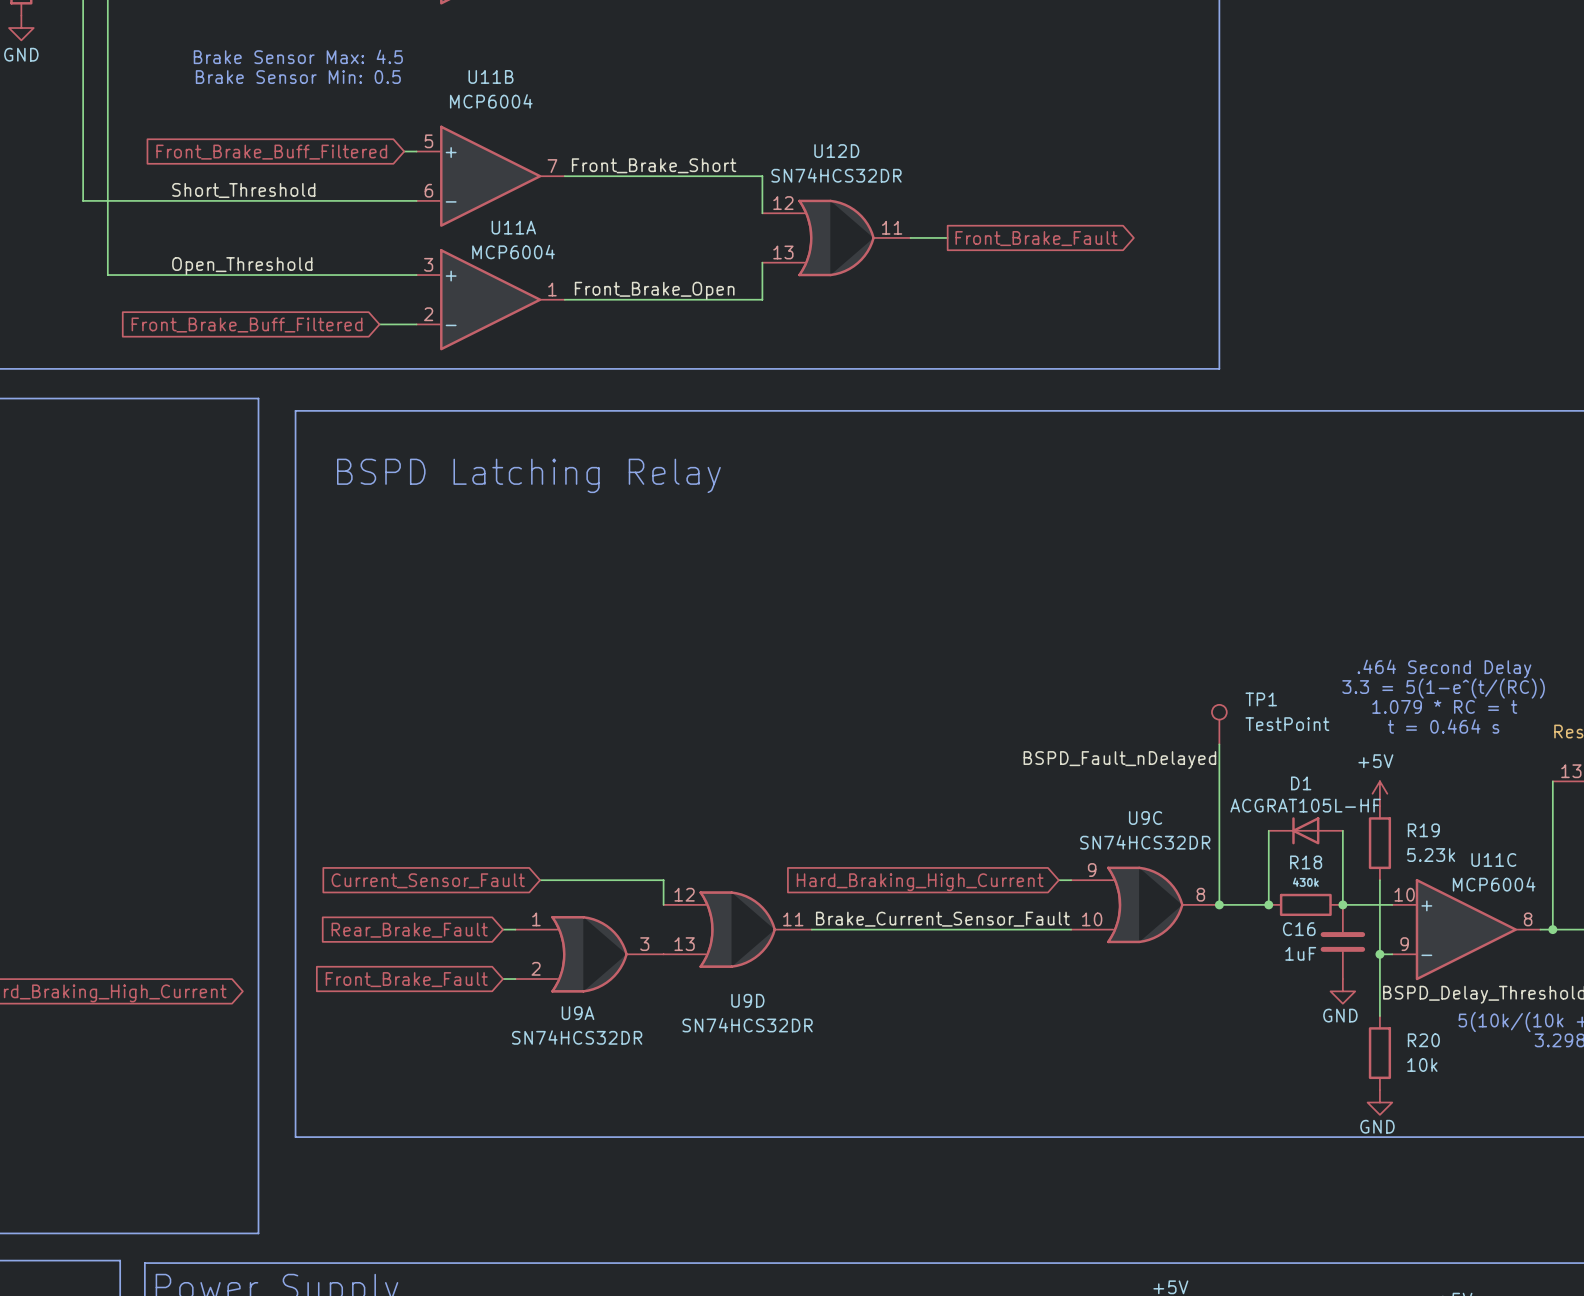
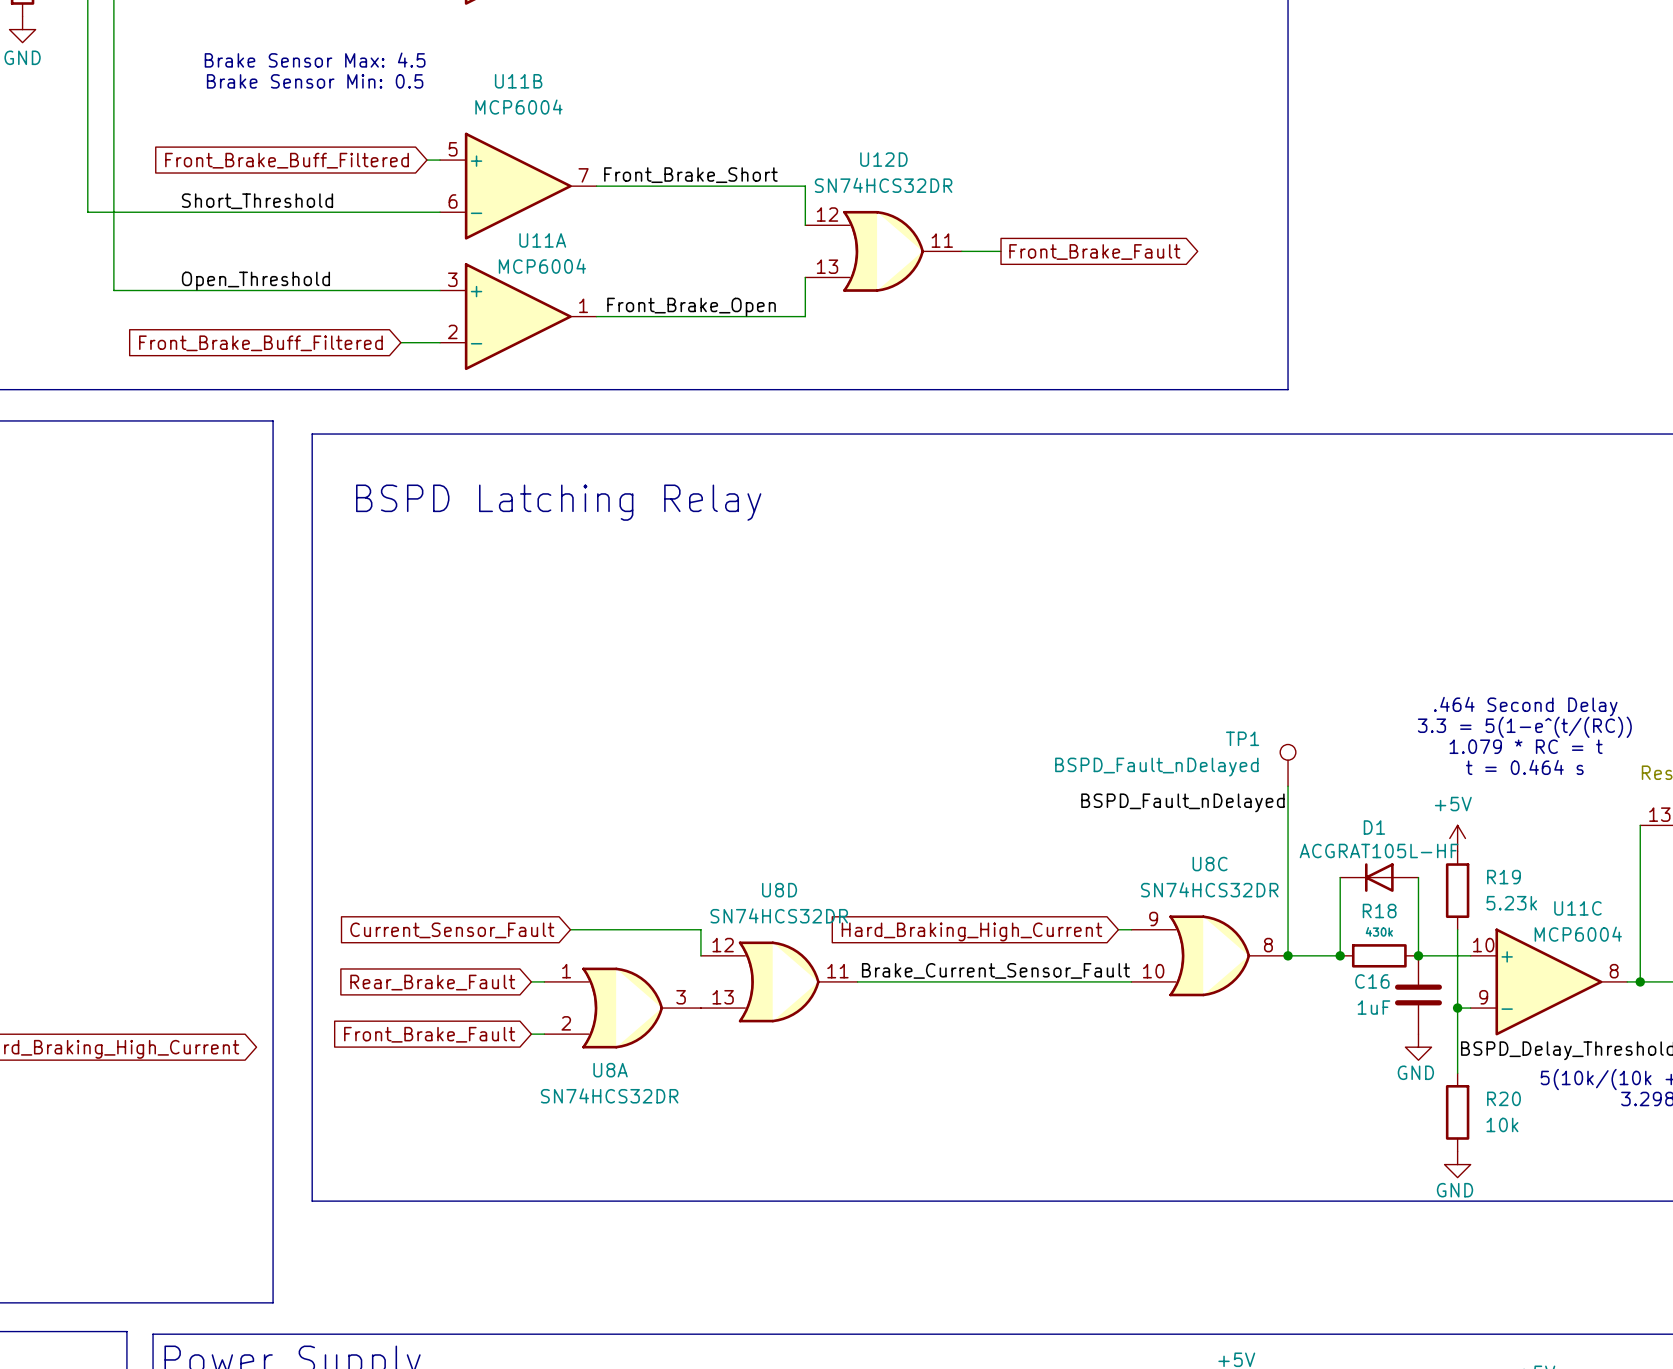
TP1 name position: TP1 (1261, 699) -> TP1 (1242, 738)
TP1 value: TestPoint (1287, 724) -> BSPD_Fault_nDelayed (1156, 767)
U9C name: U9C (1145, 817) -> U8C (1210, 864)
U9D name: U9D (747, 1000) -> U8D (779, 890)
U9A name: U9A (578, 1013) -> U8A (610, 1070)
U9D value position: SN74HCS32DR (747, 1025) -> SN74HCS32DR (779, 915)

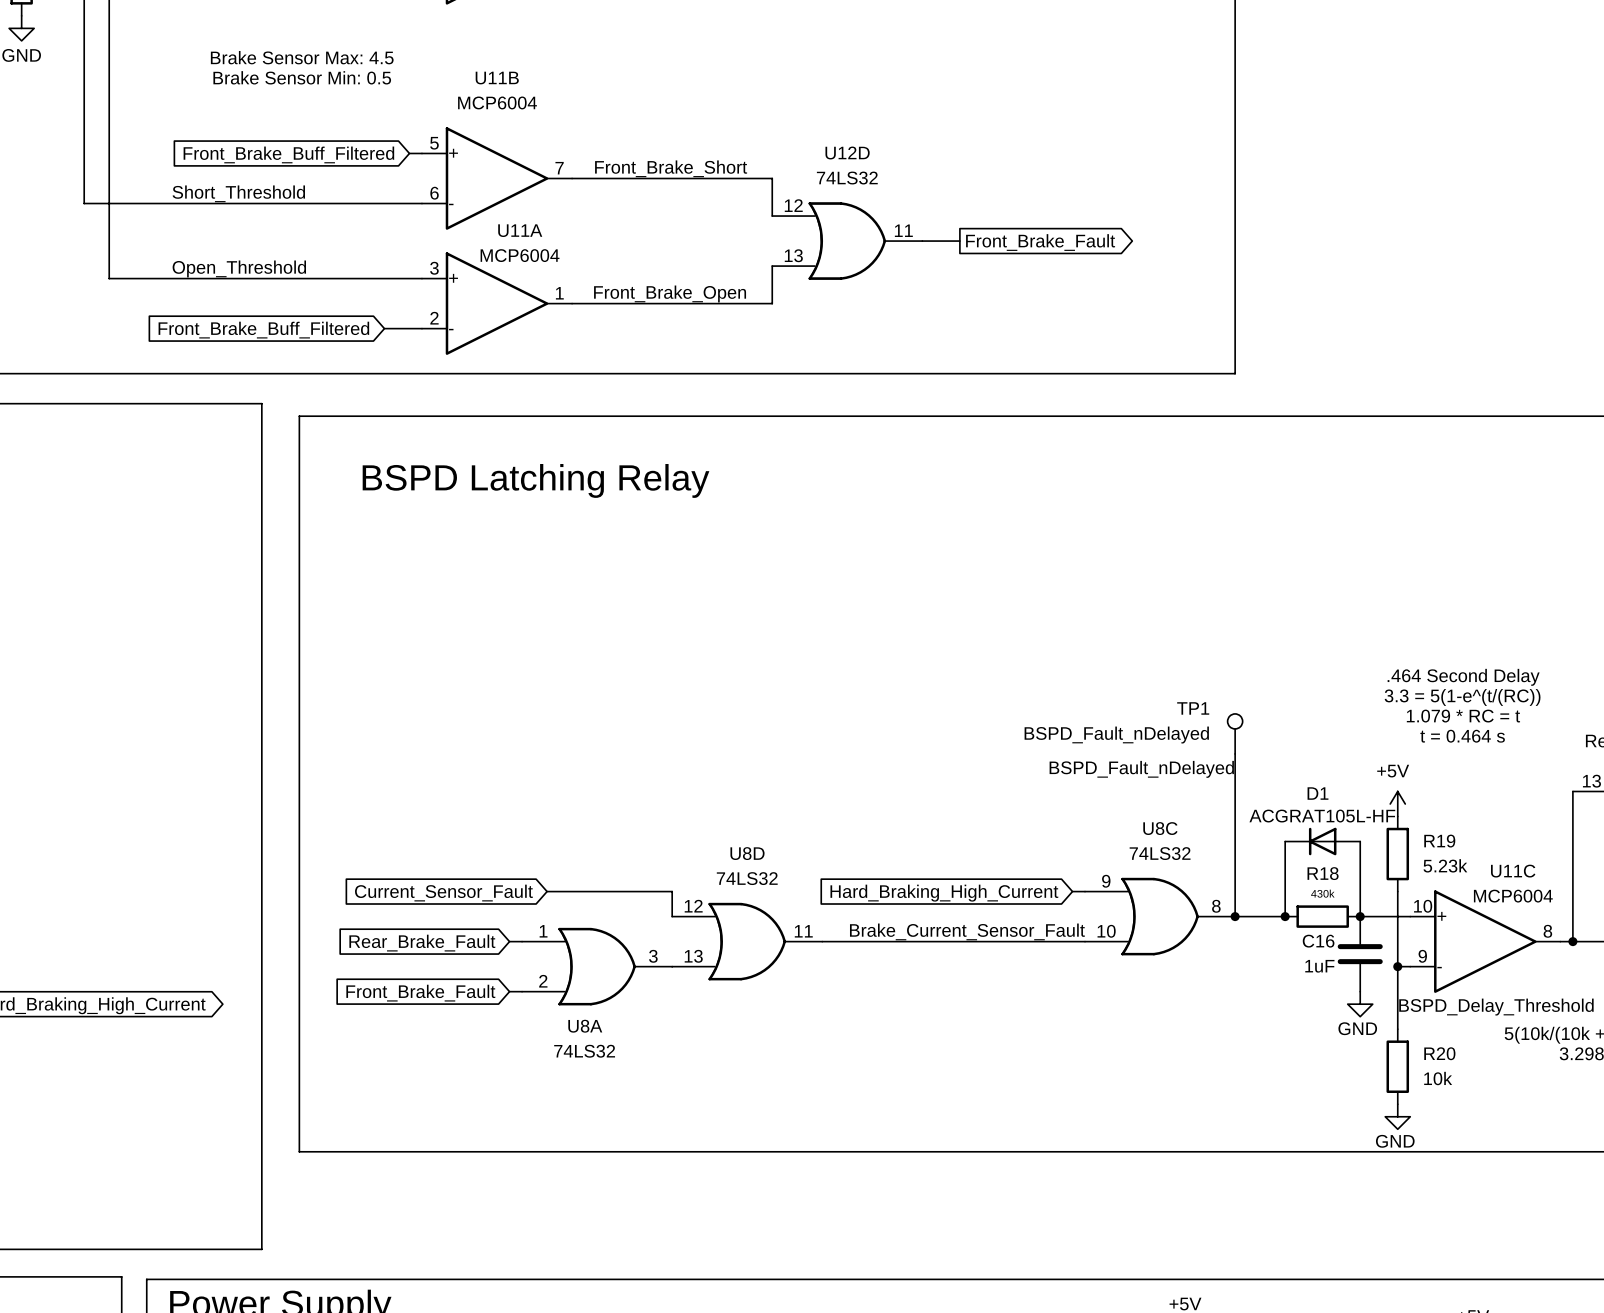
U12D value: SN74HCS32DR (883, 185) -> 74LS32 (847, 178)
U8C value: SN74HCS32DR (1209, 889) -> 74LS32 (1160, 853)
U8D value: SN74HCS32DR (779, 915) -> 74LS32 (747, 878)
U8A value: SN74HCS32DR (609, 1095) -> 74LS32 (584, 1051)

